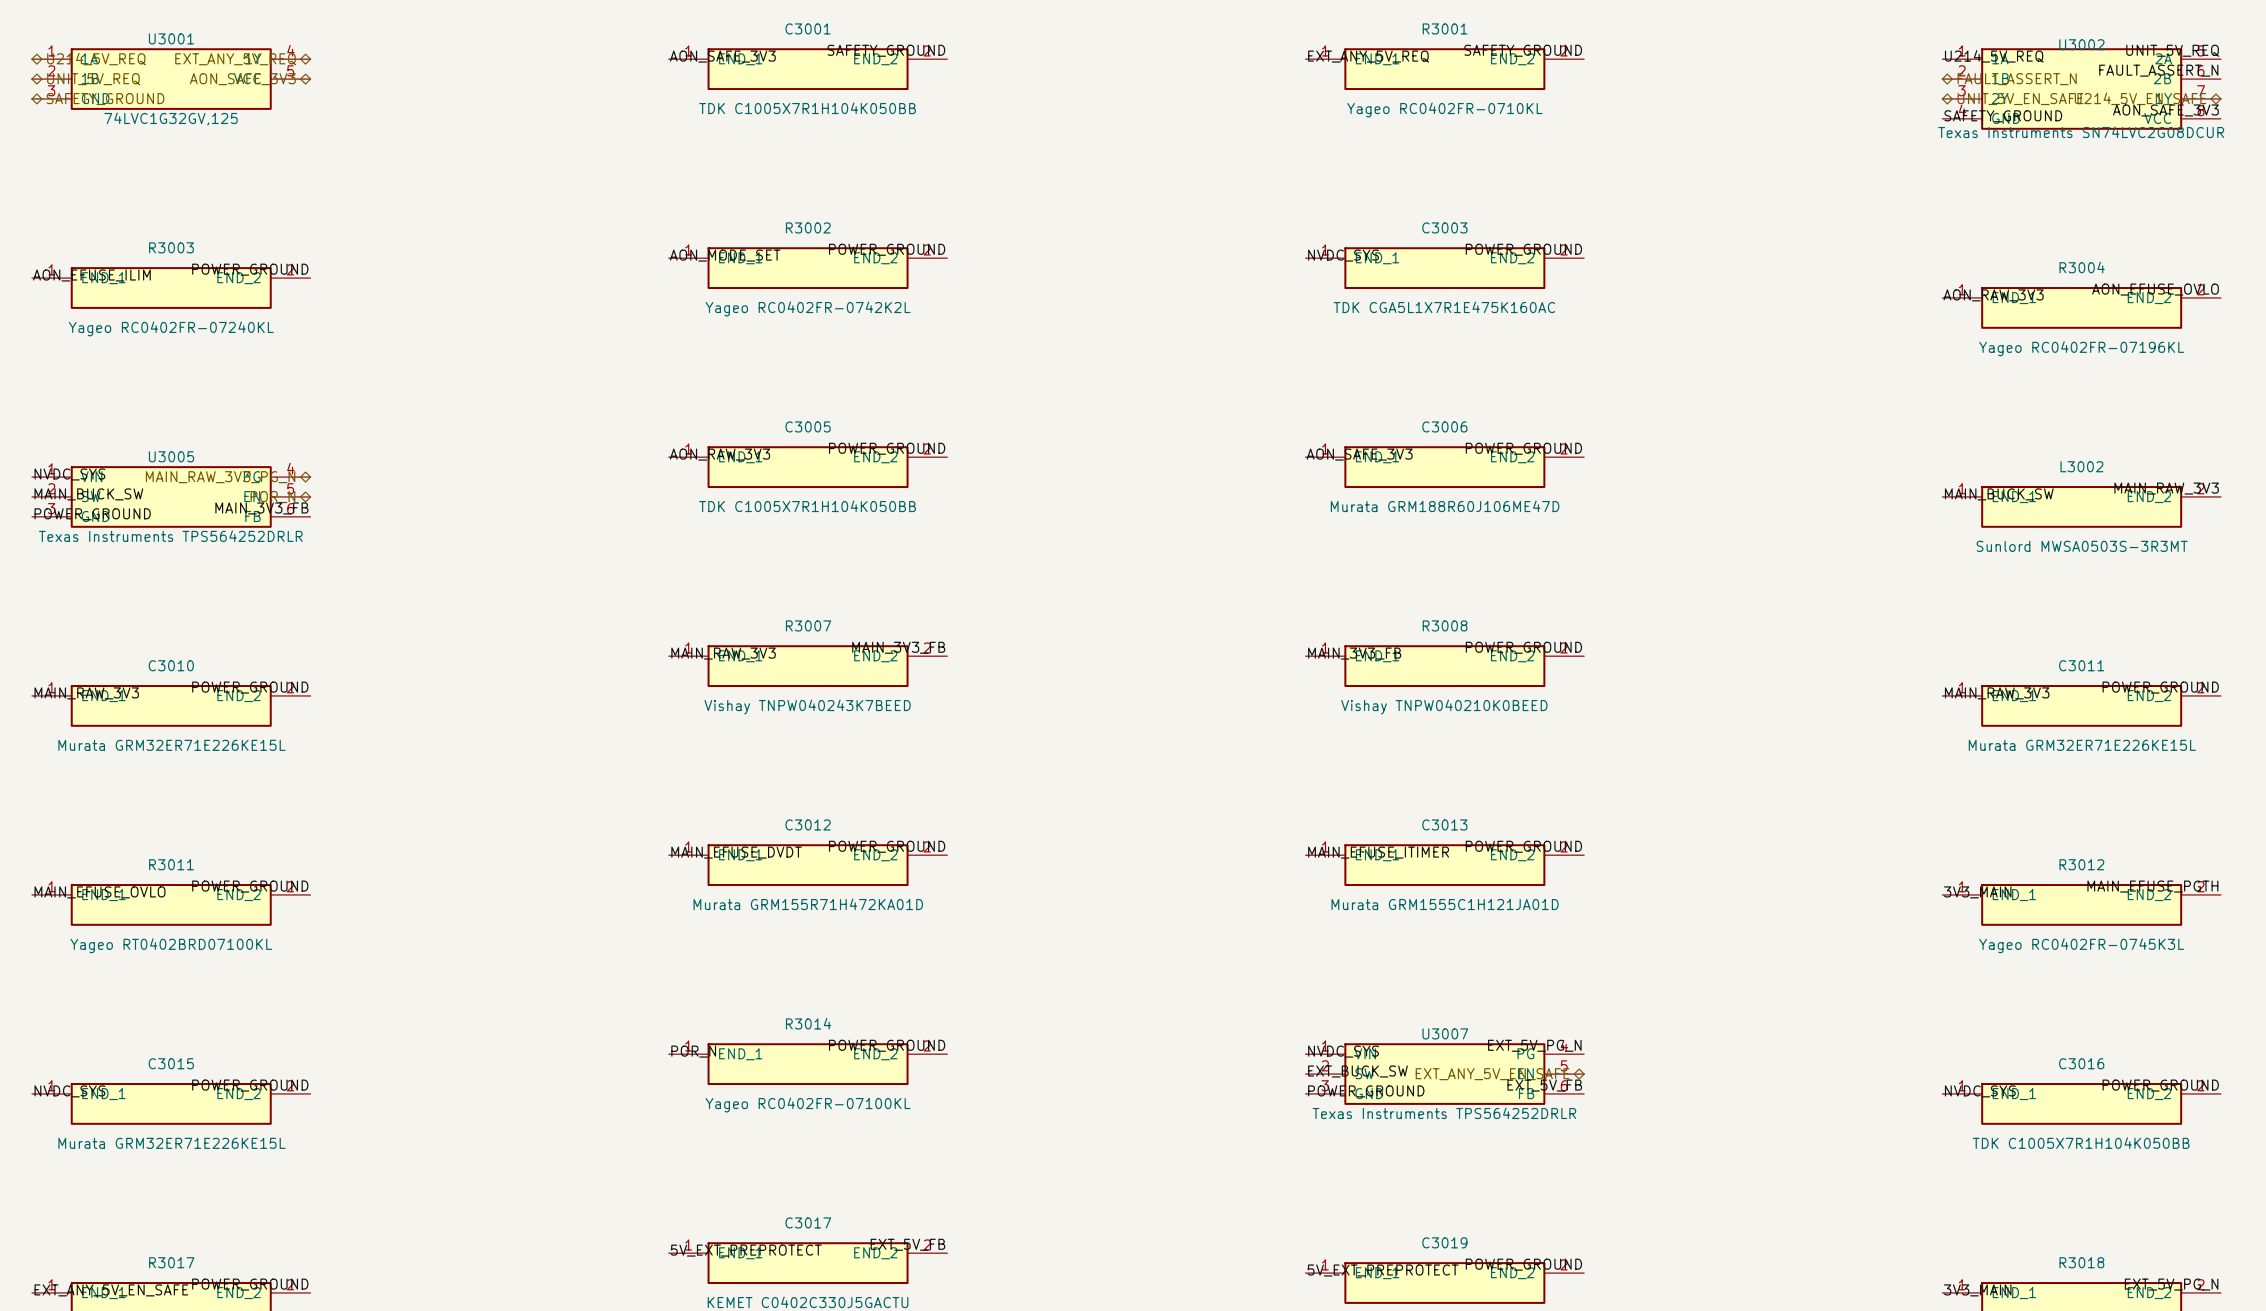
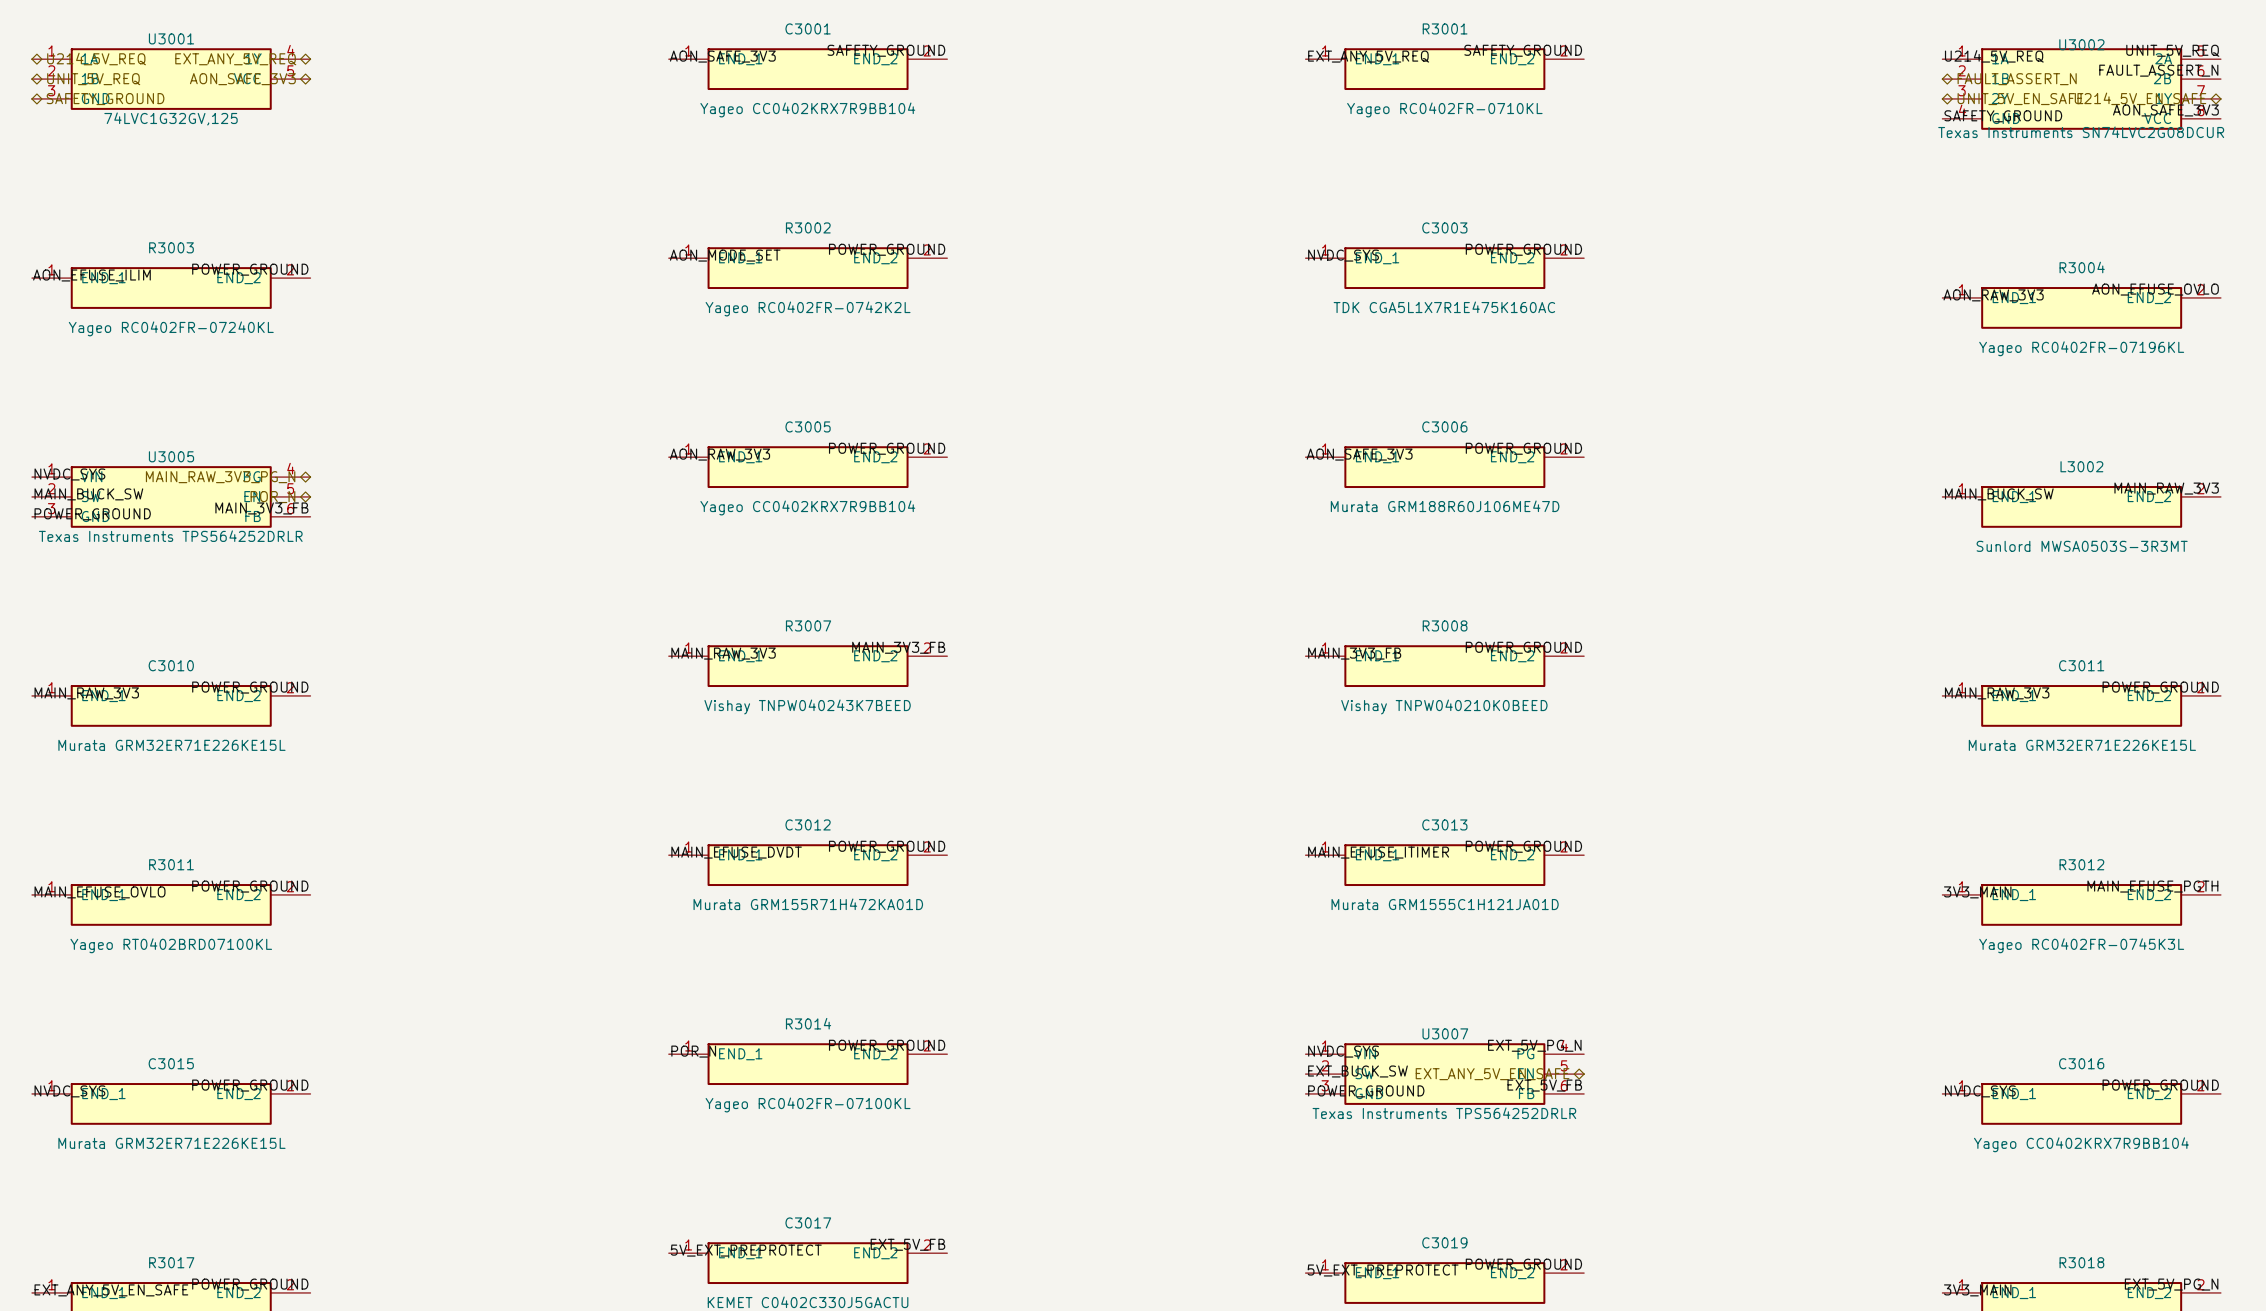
C3001 value: TDK C1005X7R1H104K050BB (807, 108) -> Yageo CC0402KRX7R9BB104 (807, 109)
C3005 value: TDK C1005X7R1H104K050BB (807, 506) -> Yageo CC0402KRX7R9BB104 (807, 507)
C3016 value: TDK C1005X7R1H104K050BB (2081, 1143) -> Yageo CC0402KRX7R9BB104 (2081, 1144)

